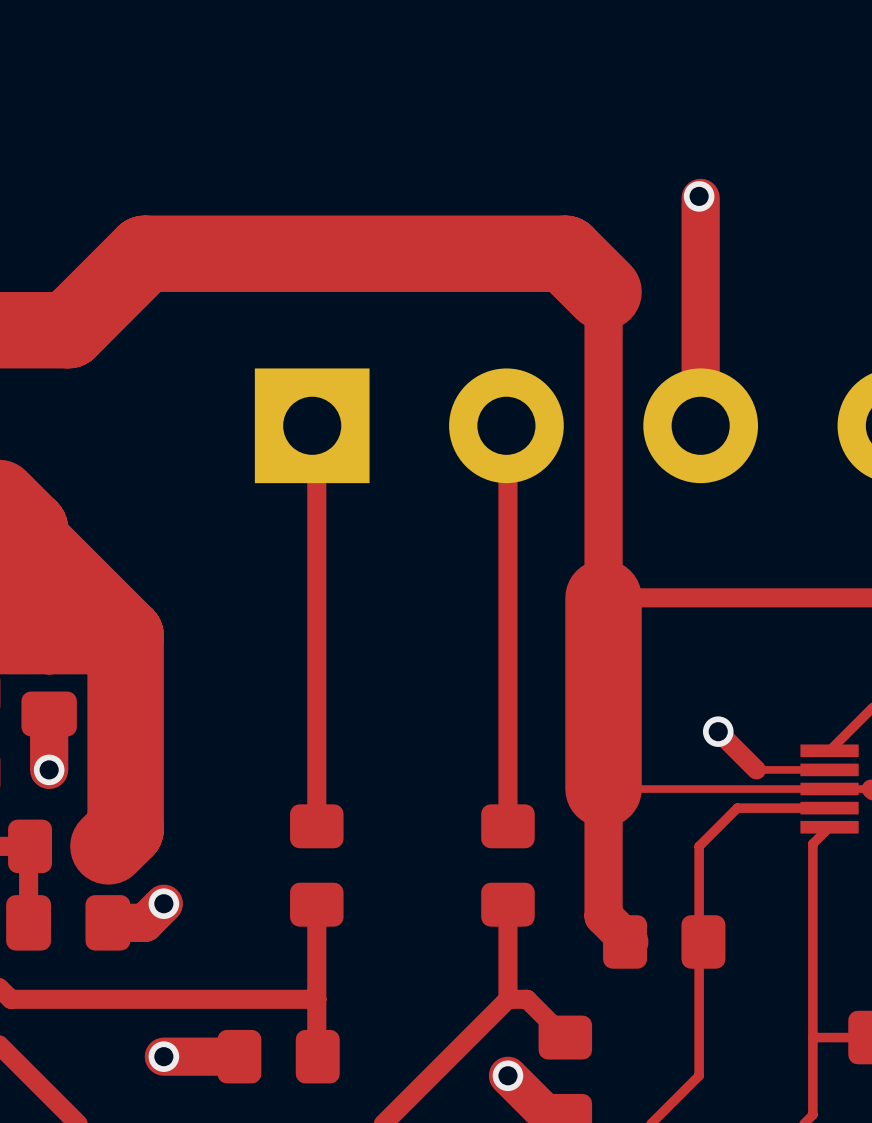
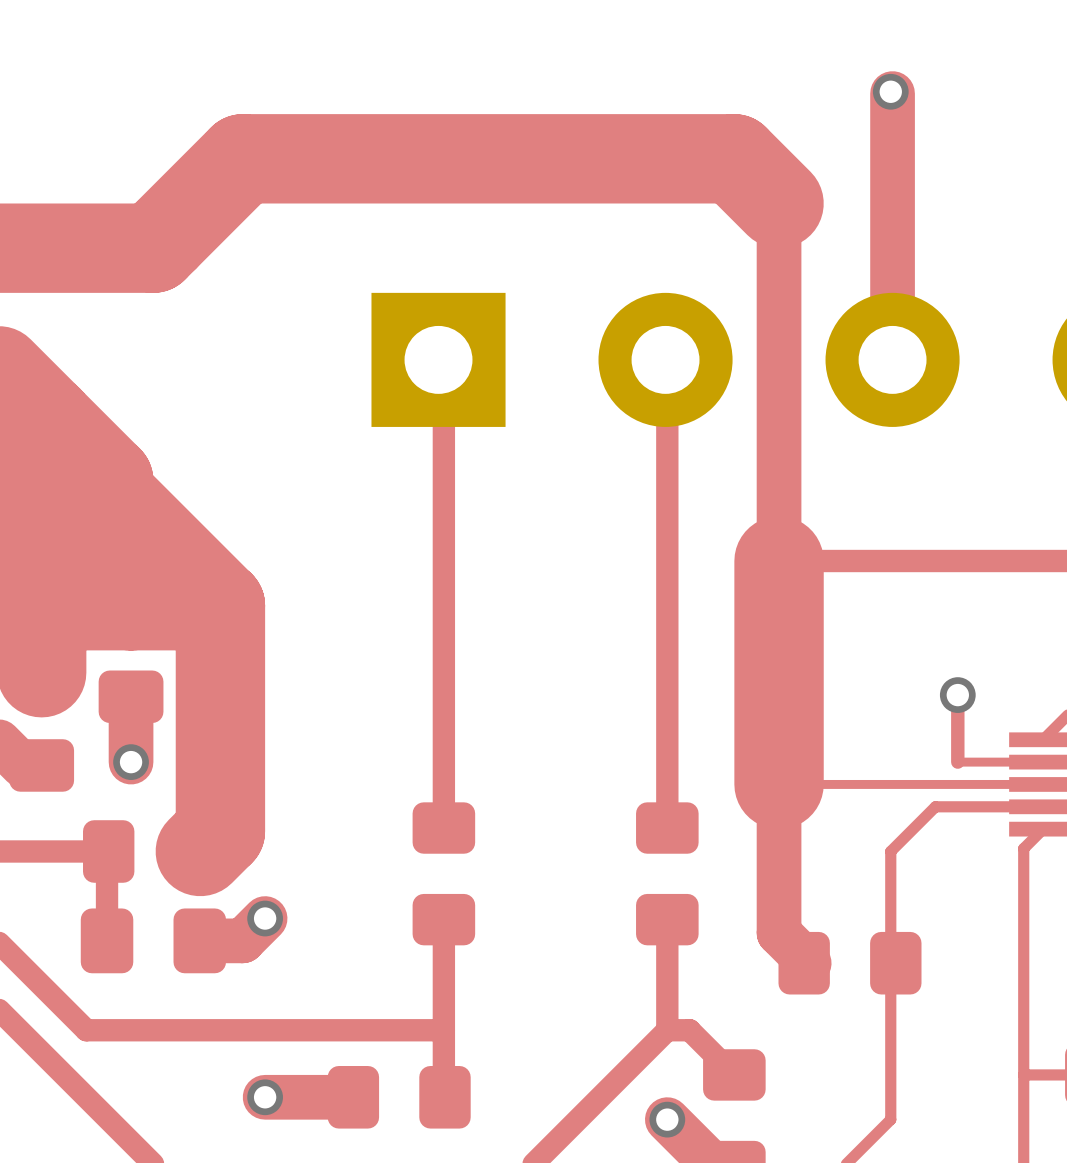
top track: (718, 731) (756, 769) -> (957, 695) (957, 762)
via position: (718, 731) -> (957, 695)

